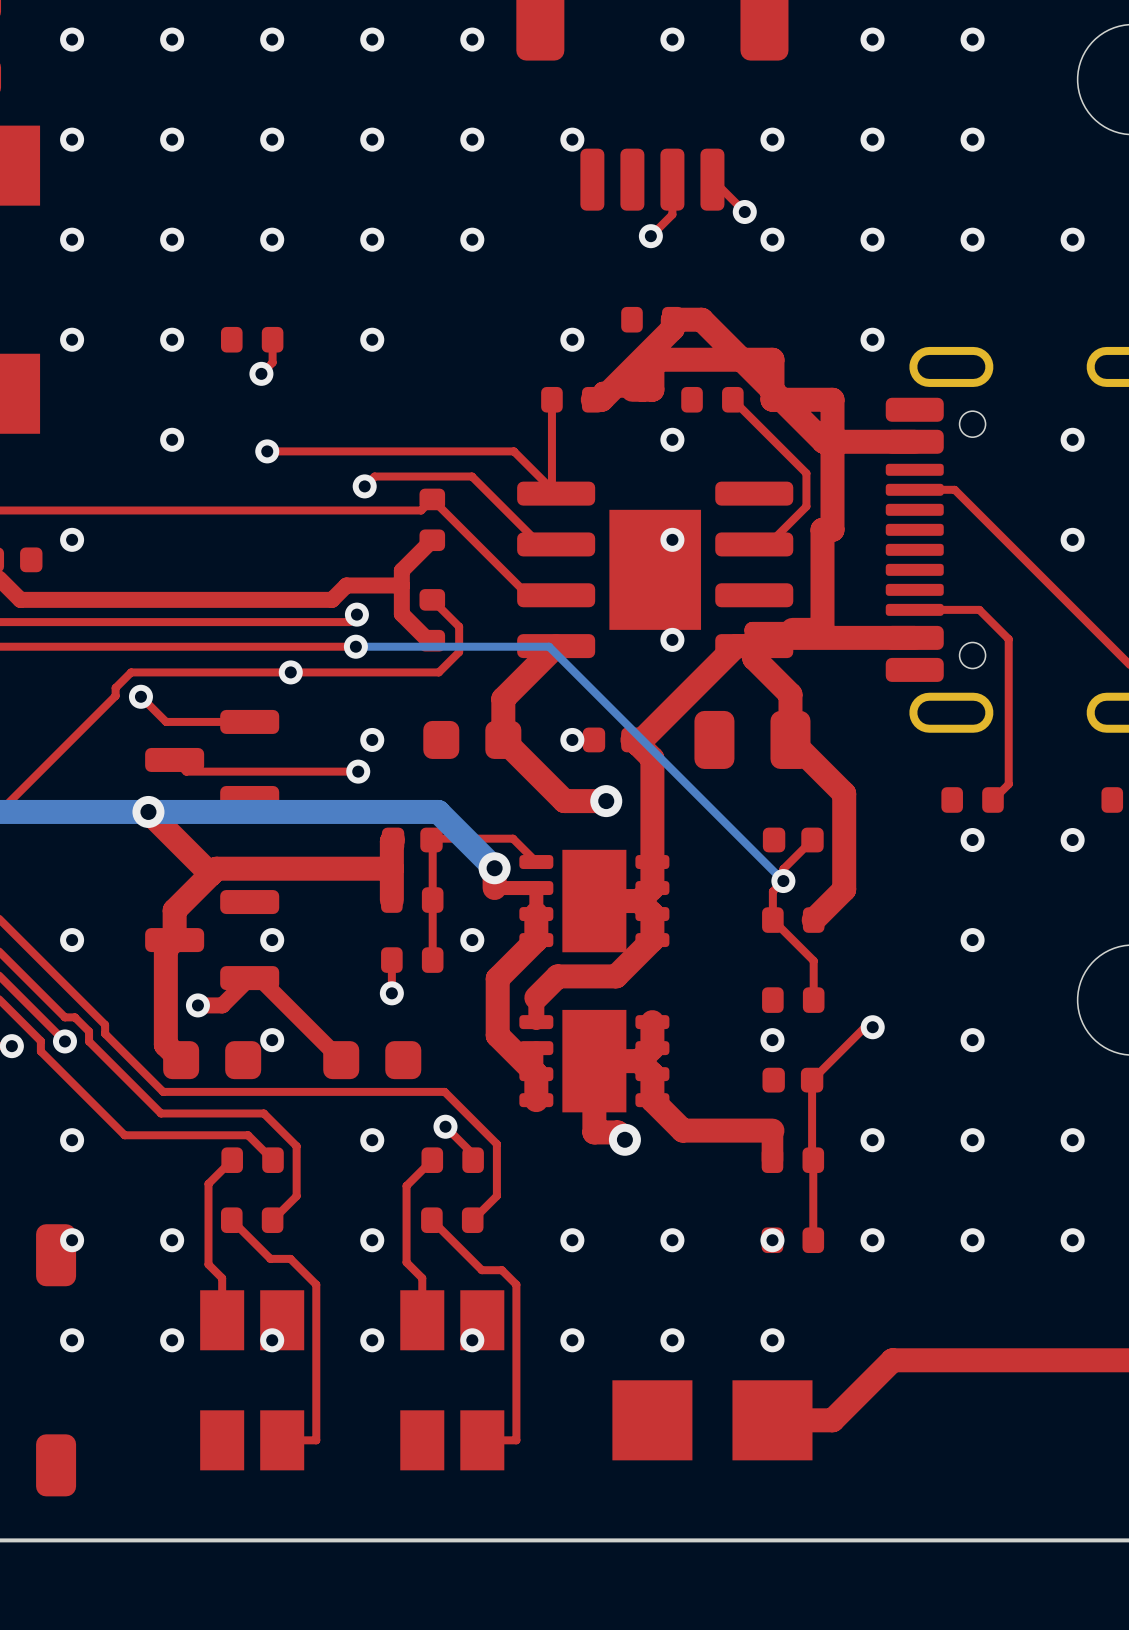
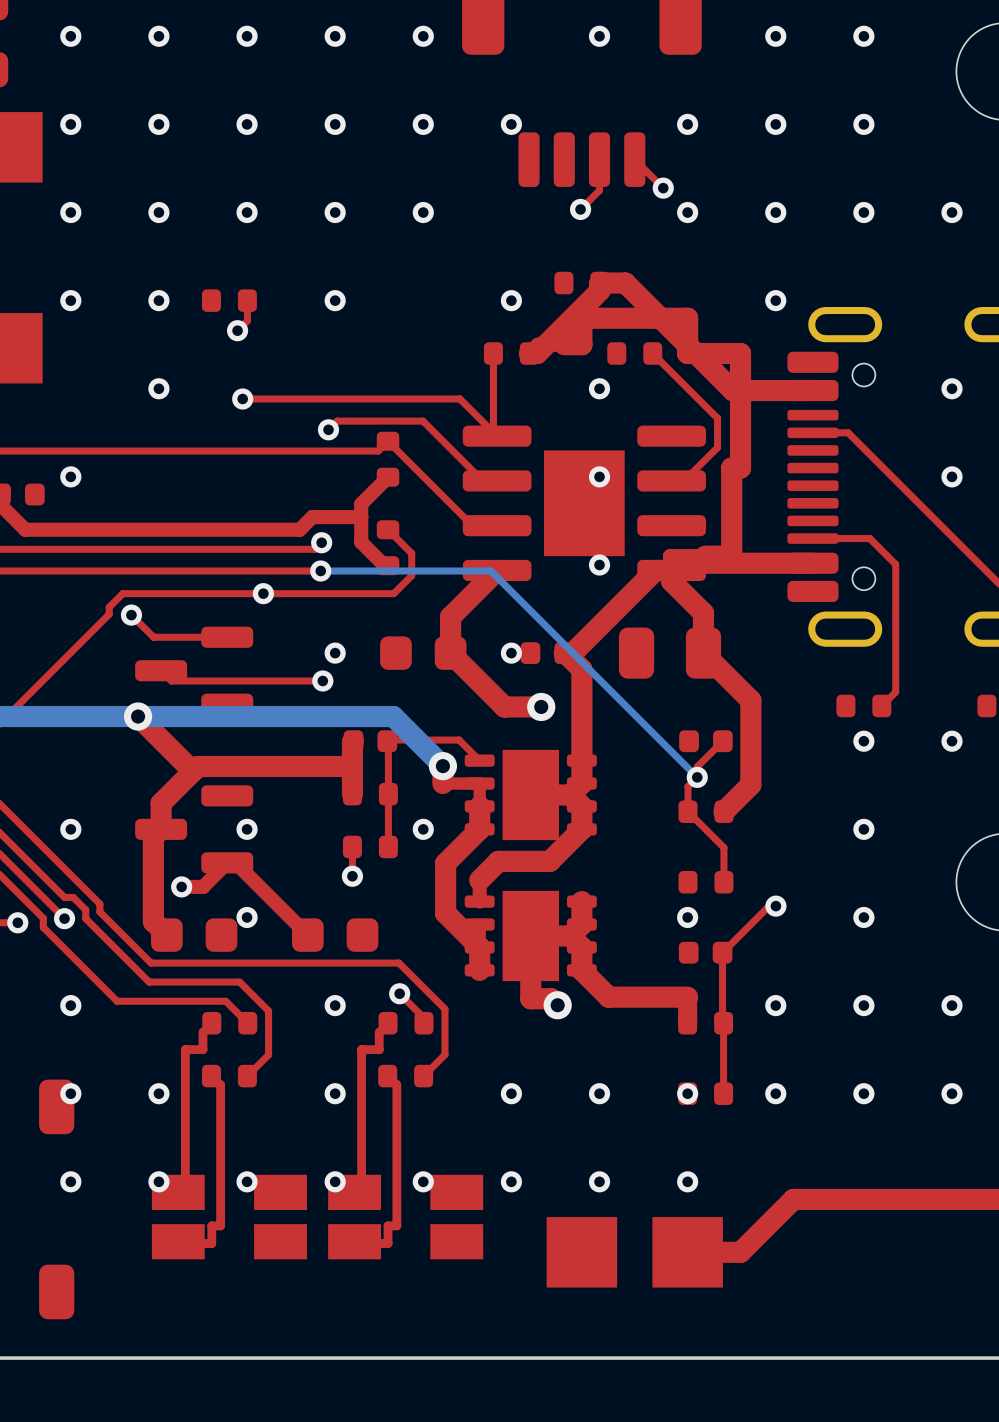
top track: (222, 1170) (208, 1183) (208, 1264) (222, 1278) (222, 1320) -> (202, 1032) (202, 1049) (185, 1049) (185, 1190) (176, 1190) (178, 1192)
top track: (422, 1170) (406, 1185) (406, 1262) (422, 1278) (422, 1320) -> (379, 1032) (379, 1049) (361, 1049) (361, 1190) (352, 1190) (354, 1192)
top track: (231, 1220) (270, 1258) (290, 1258) (316, 1284) (316, 1440) (282, 1440) -> (211, 1076) (220, 1084) (220, 1225) (211, 1225) (211, 1243) (176, 1243) (178, 1241)
top track: (431, 1220) (481, 1270) (501, 1270) (516, 1284) (516, 1440) (482, 1440) -> (387, 1076) (396, 1084) (396, 1225) (388, 1225) (388, 1243) (352, 1243) (354, 1241)
part footprint: [200, 1290, 305, 1471] -> [151, 1174, 307, 1260]
part footprint: [400, 1290, 505, 1471] -> [328, 1174, 484, 1260]

